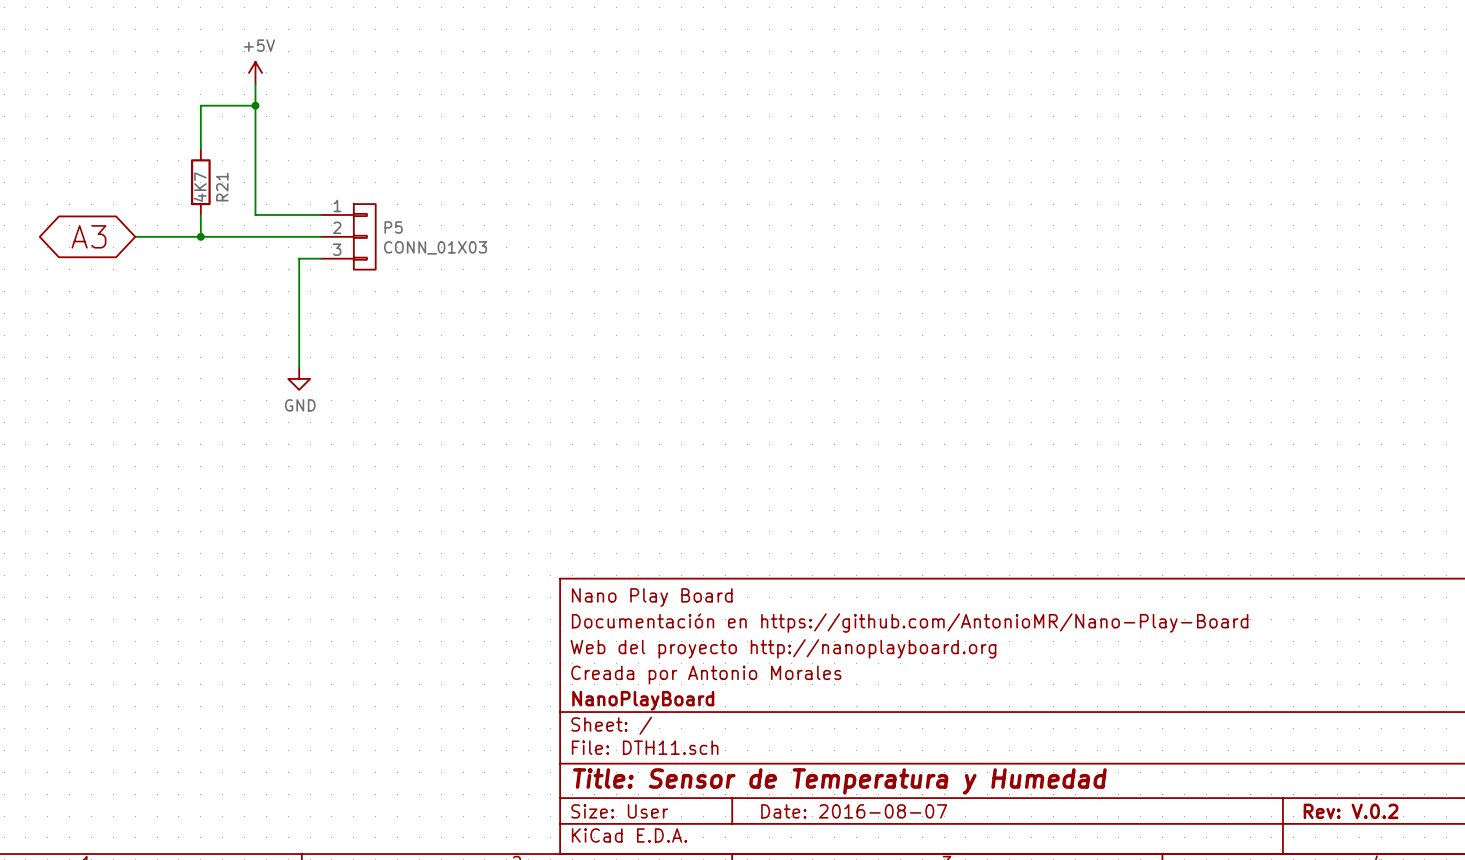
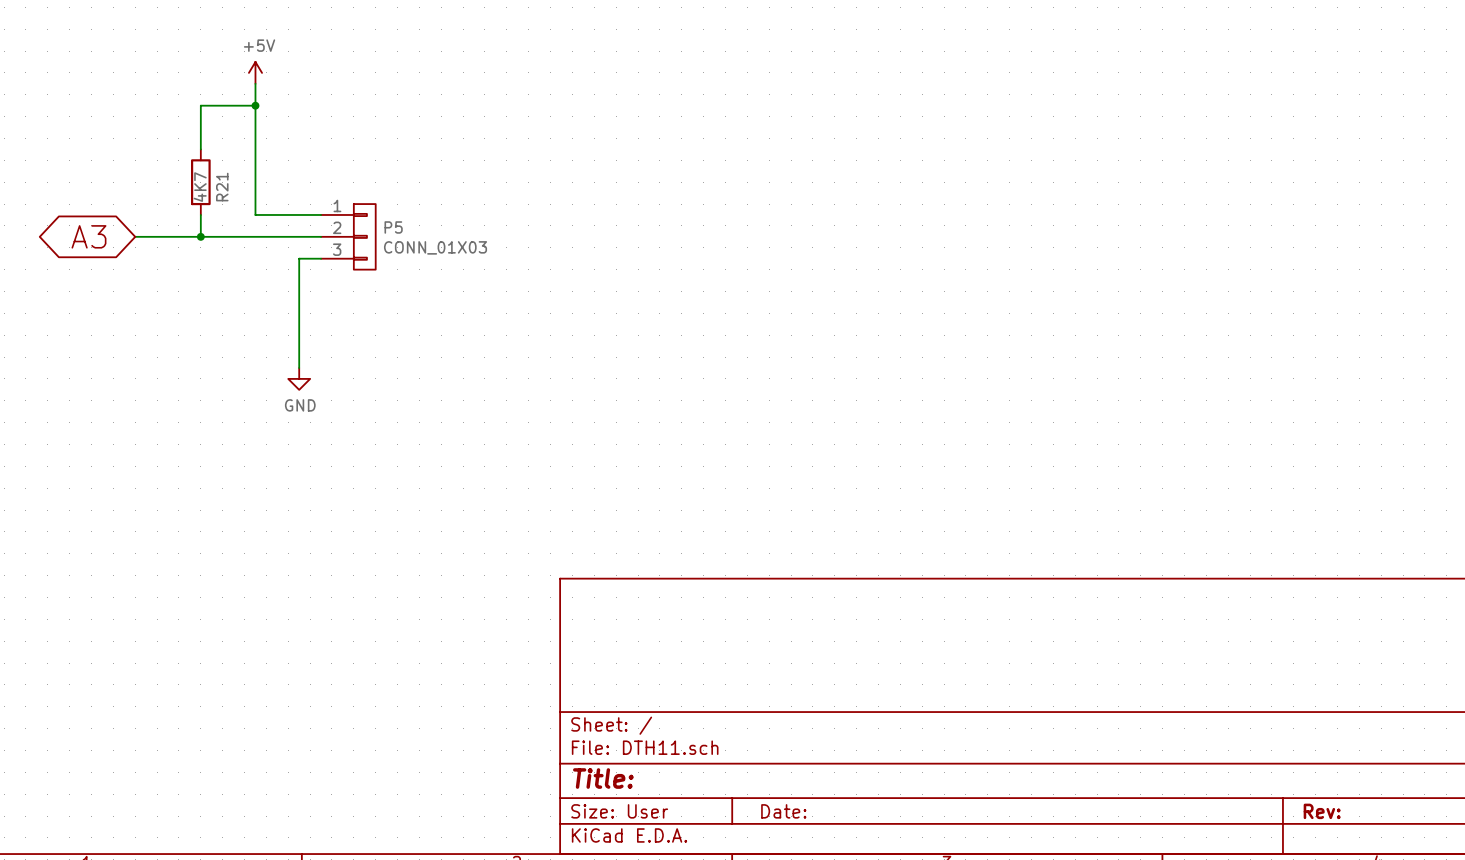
title block: Nano Play Board (652, 597) -> none
title block: Documentación en https://github.com/AntonioMR/Nano-Play-Board (910, 623) -> none
title block: Web del proyecto http://nanoplayboard.org (783, 648) -> none
title block: Creada por Antonio Morales (706, 674) -> none
title block: NanoPlayBoard (643, 700) -> none
title block: Title: Sensor de Temperatura y Humedad (839, 781) -> Title: (603, 778)
title block: Date: 2016-08-07 (854, 811) -> Date: (783, 811)
title block: Rev: V.0.2 (1351, 811) -> Rev: (1322, 811)

